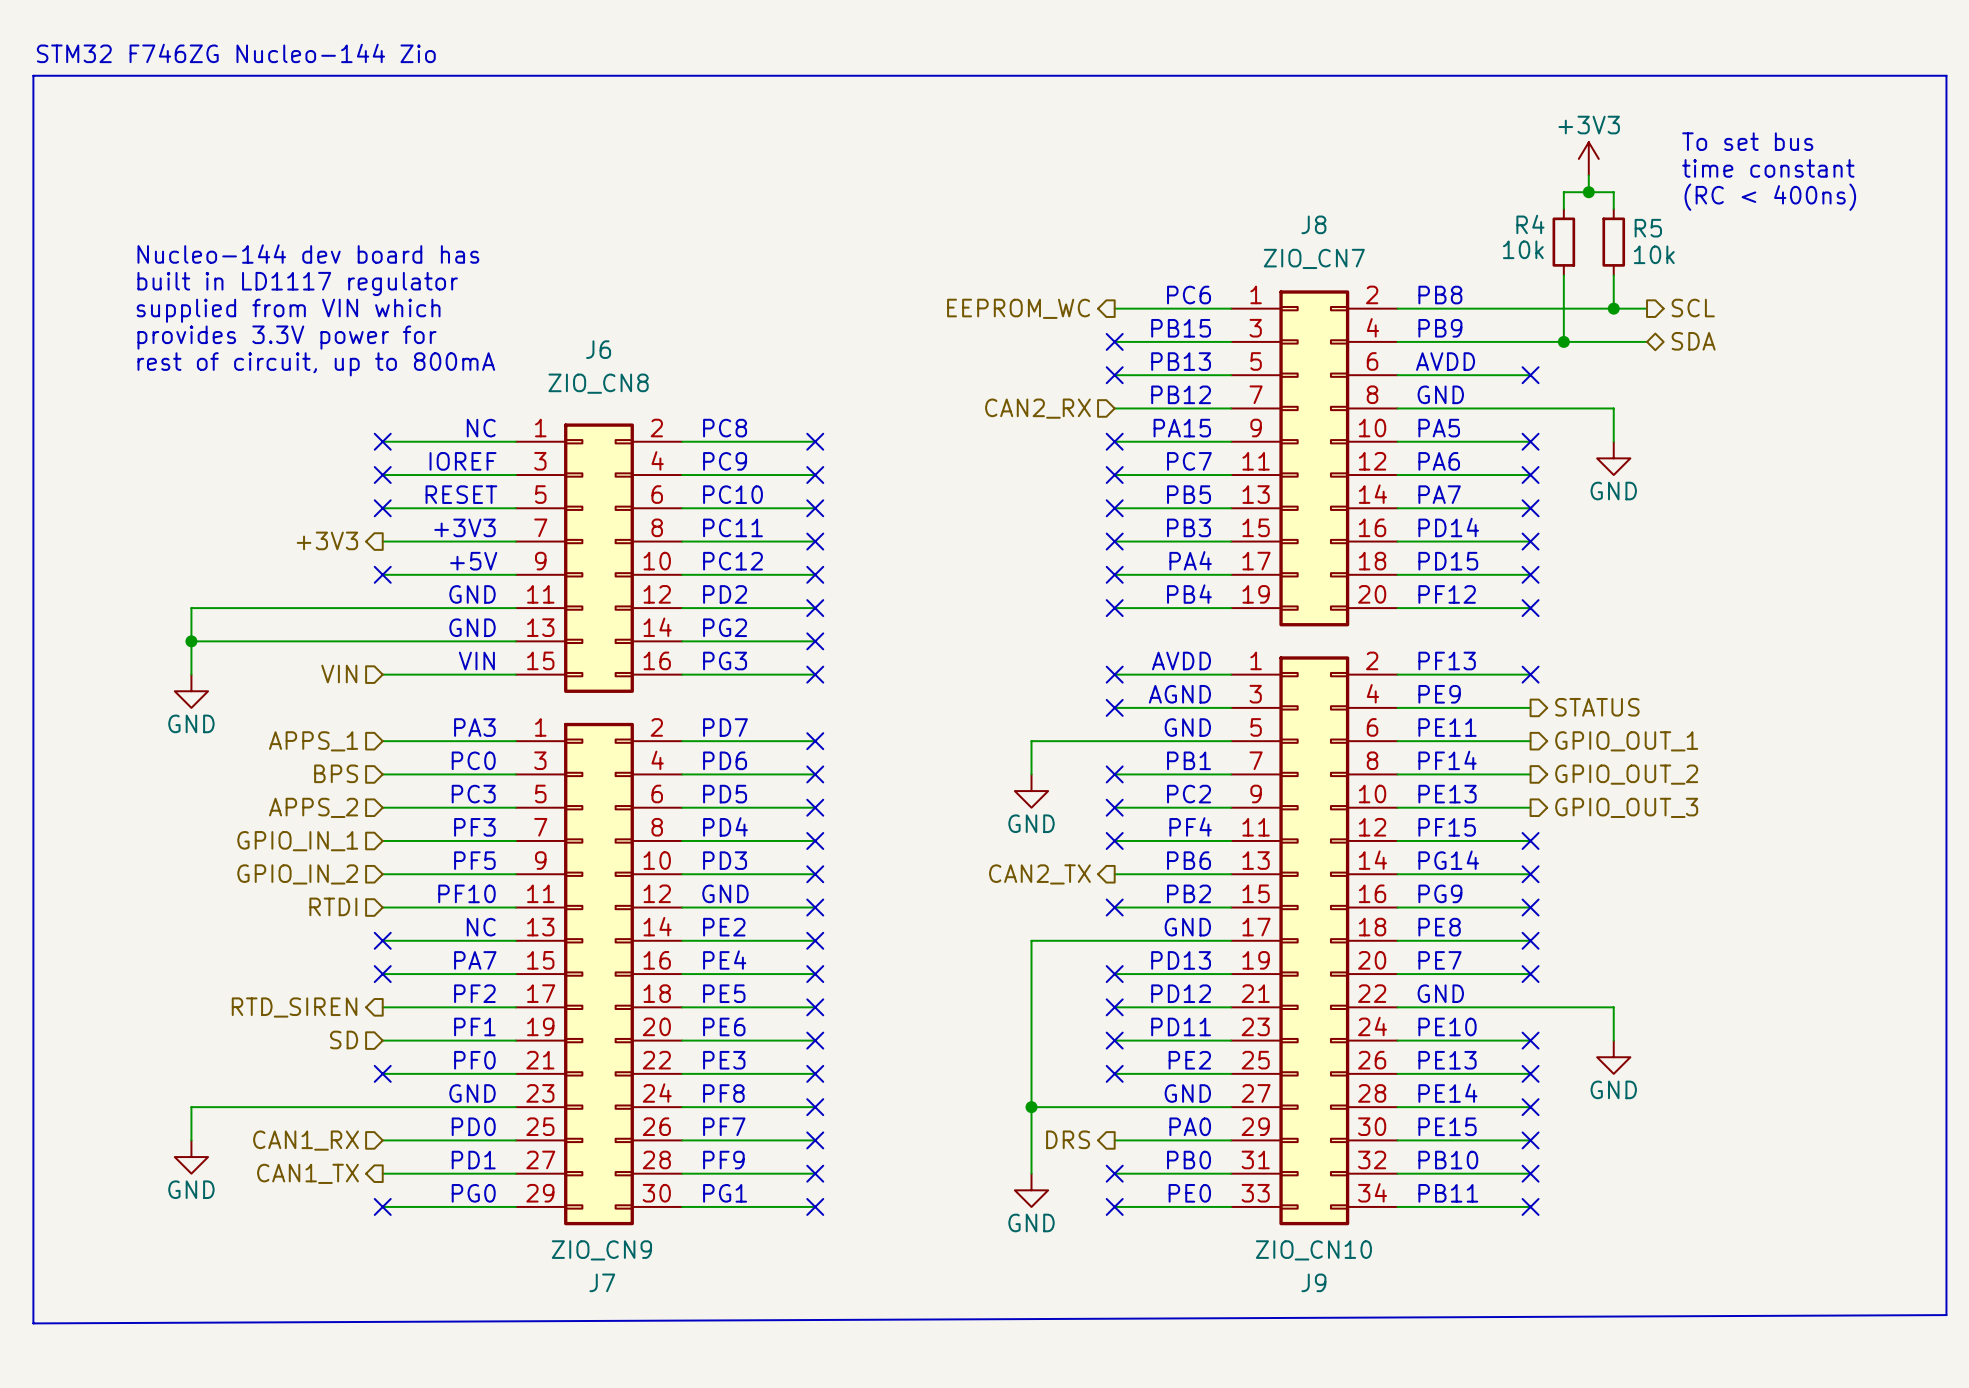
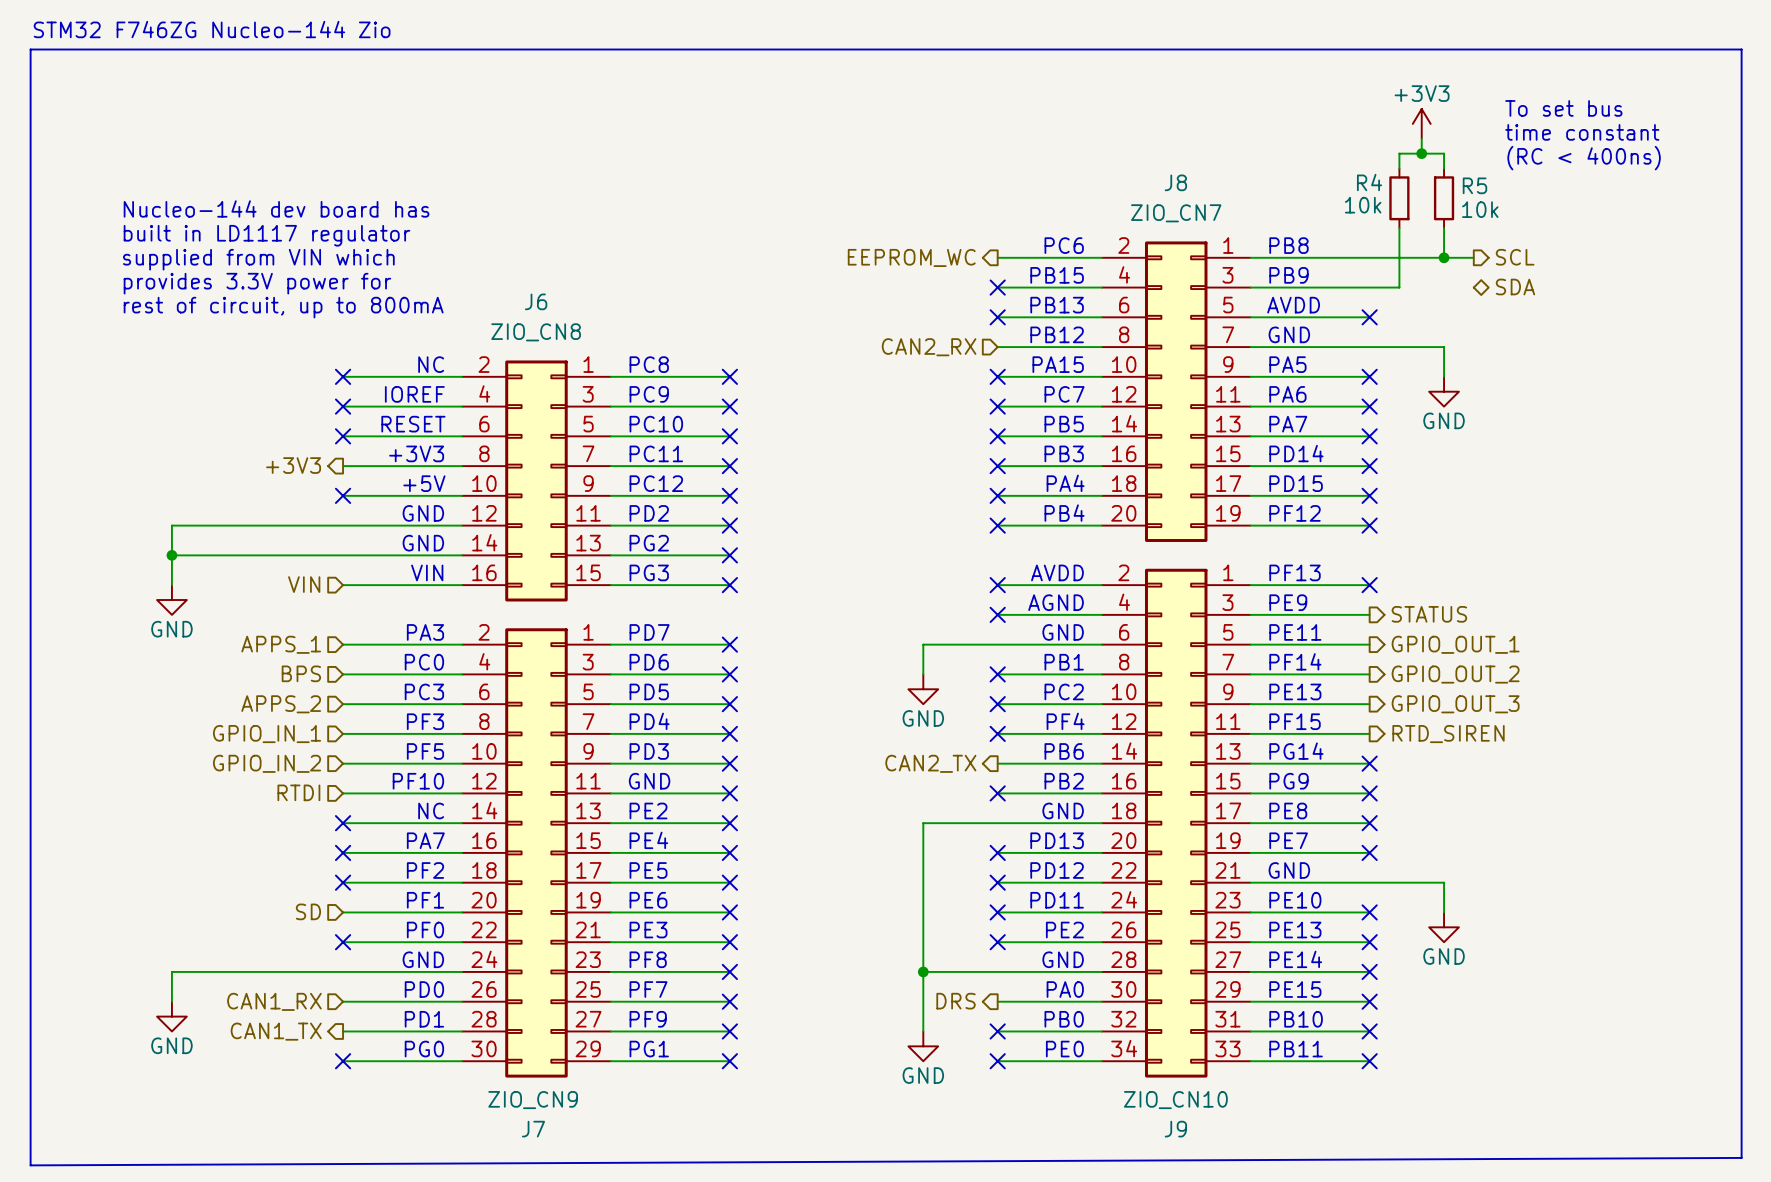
wire: (1563, 341) (1647, 341) -> none
junction: (1563, 341) -> none
J8 flip: as is (1314, 458) -> left-right (1176, 391)
J6 flip: as is (598, 558) -> left-right (536, 480)
no-connect mark: (1530, 840) -> none
hierarchical label: none -> RTD_SIREN (1448, 734)
J9 flip: as is (1314, 940) -> left-right (1176, 823)
J7 flip: as is (598, 974) -> left-right (536, 852)
hierarchical label: RTD_SIREN (294, 1007) -> none
no-connect mark: none -> (343, 882)

